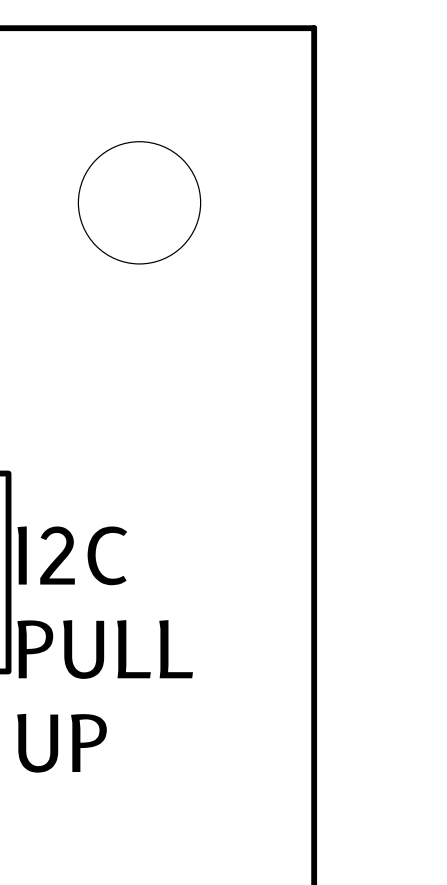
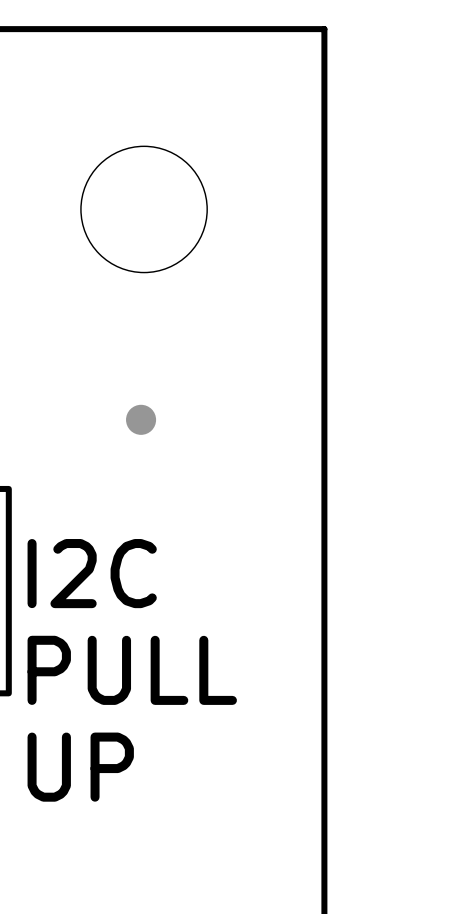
part: none -> (141, 419)

